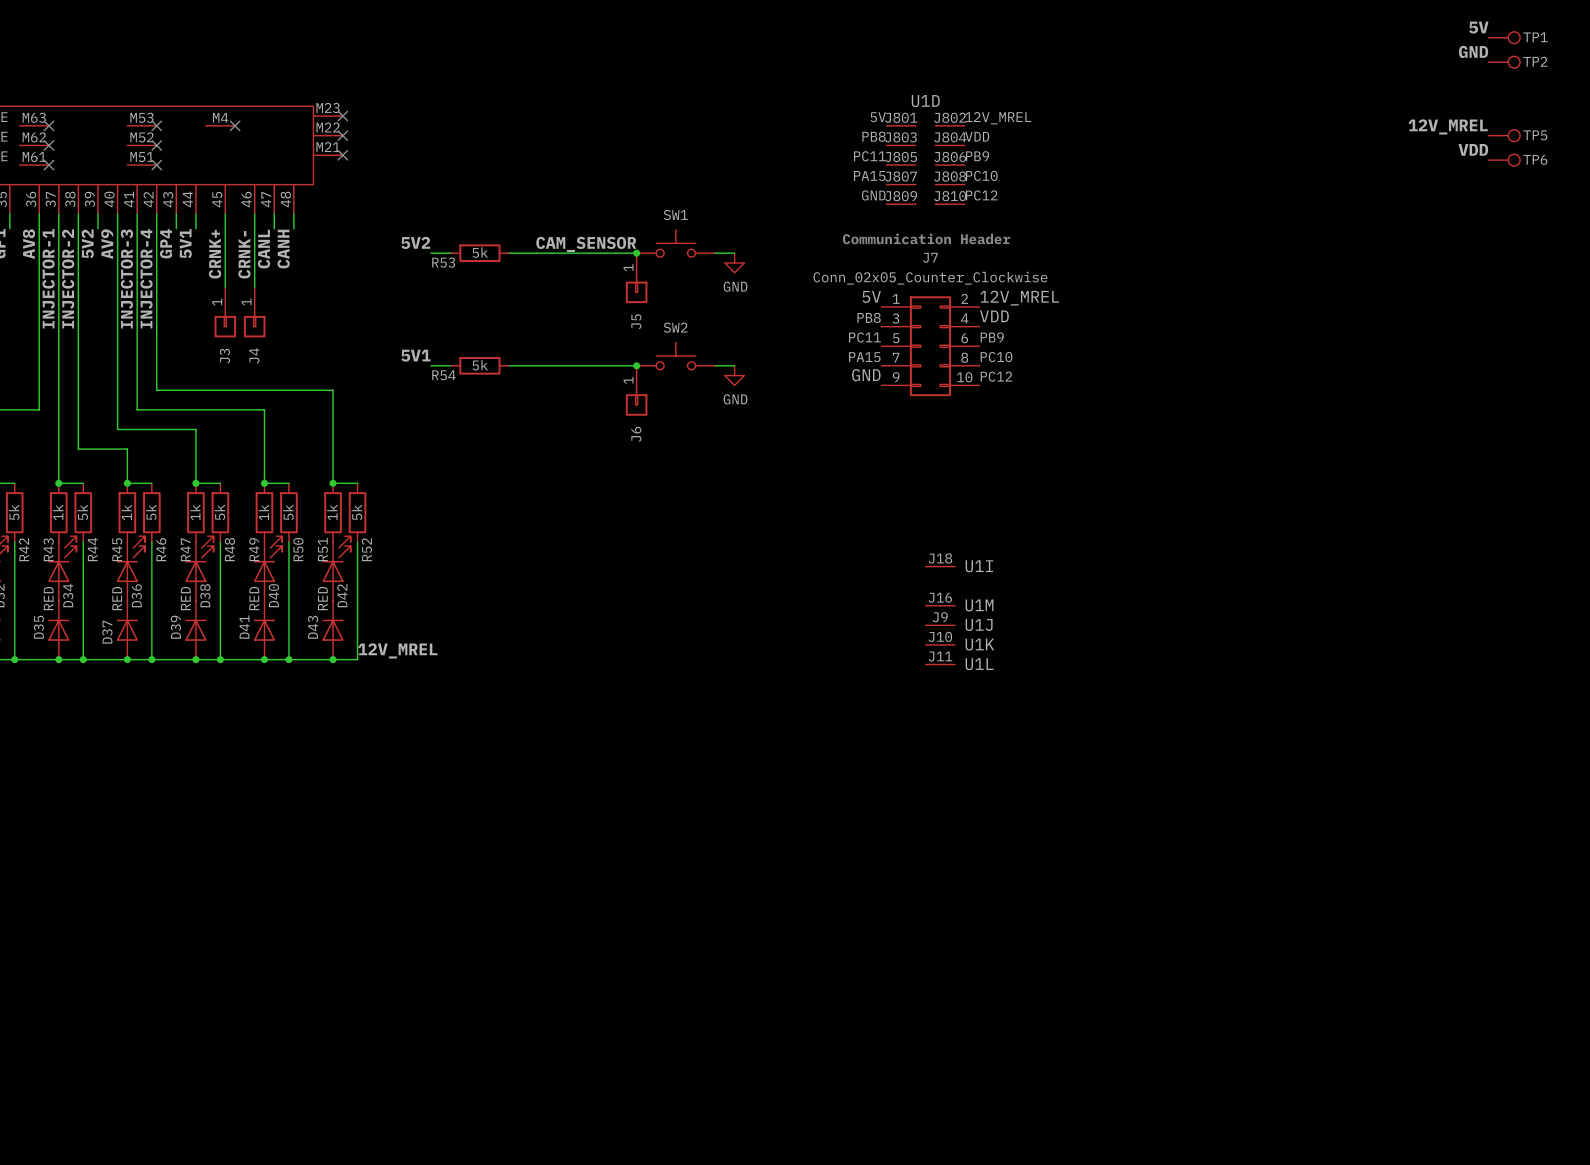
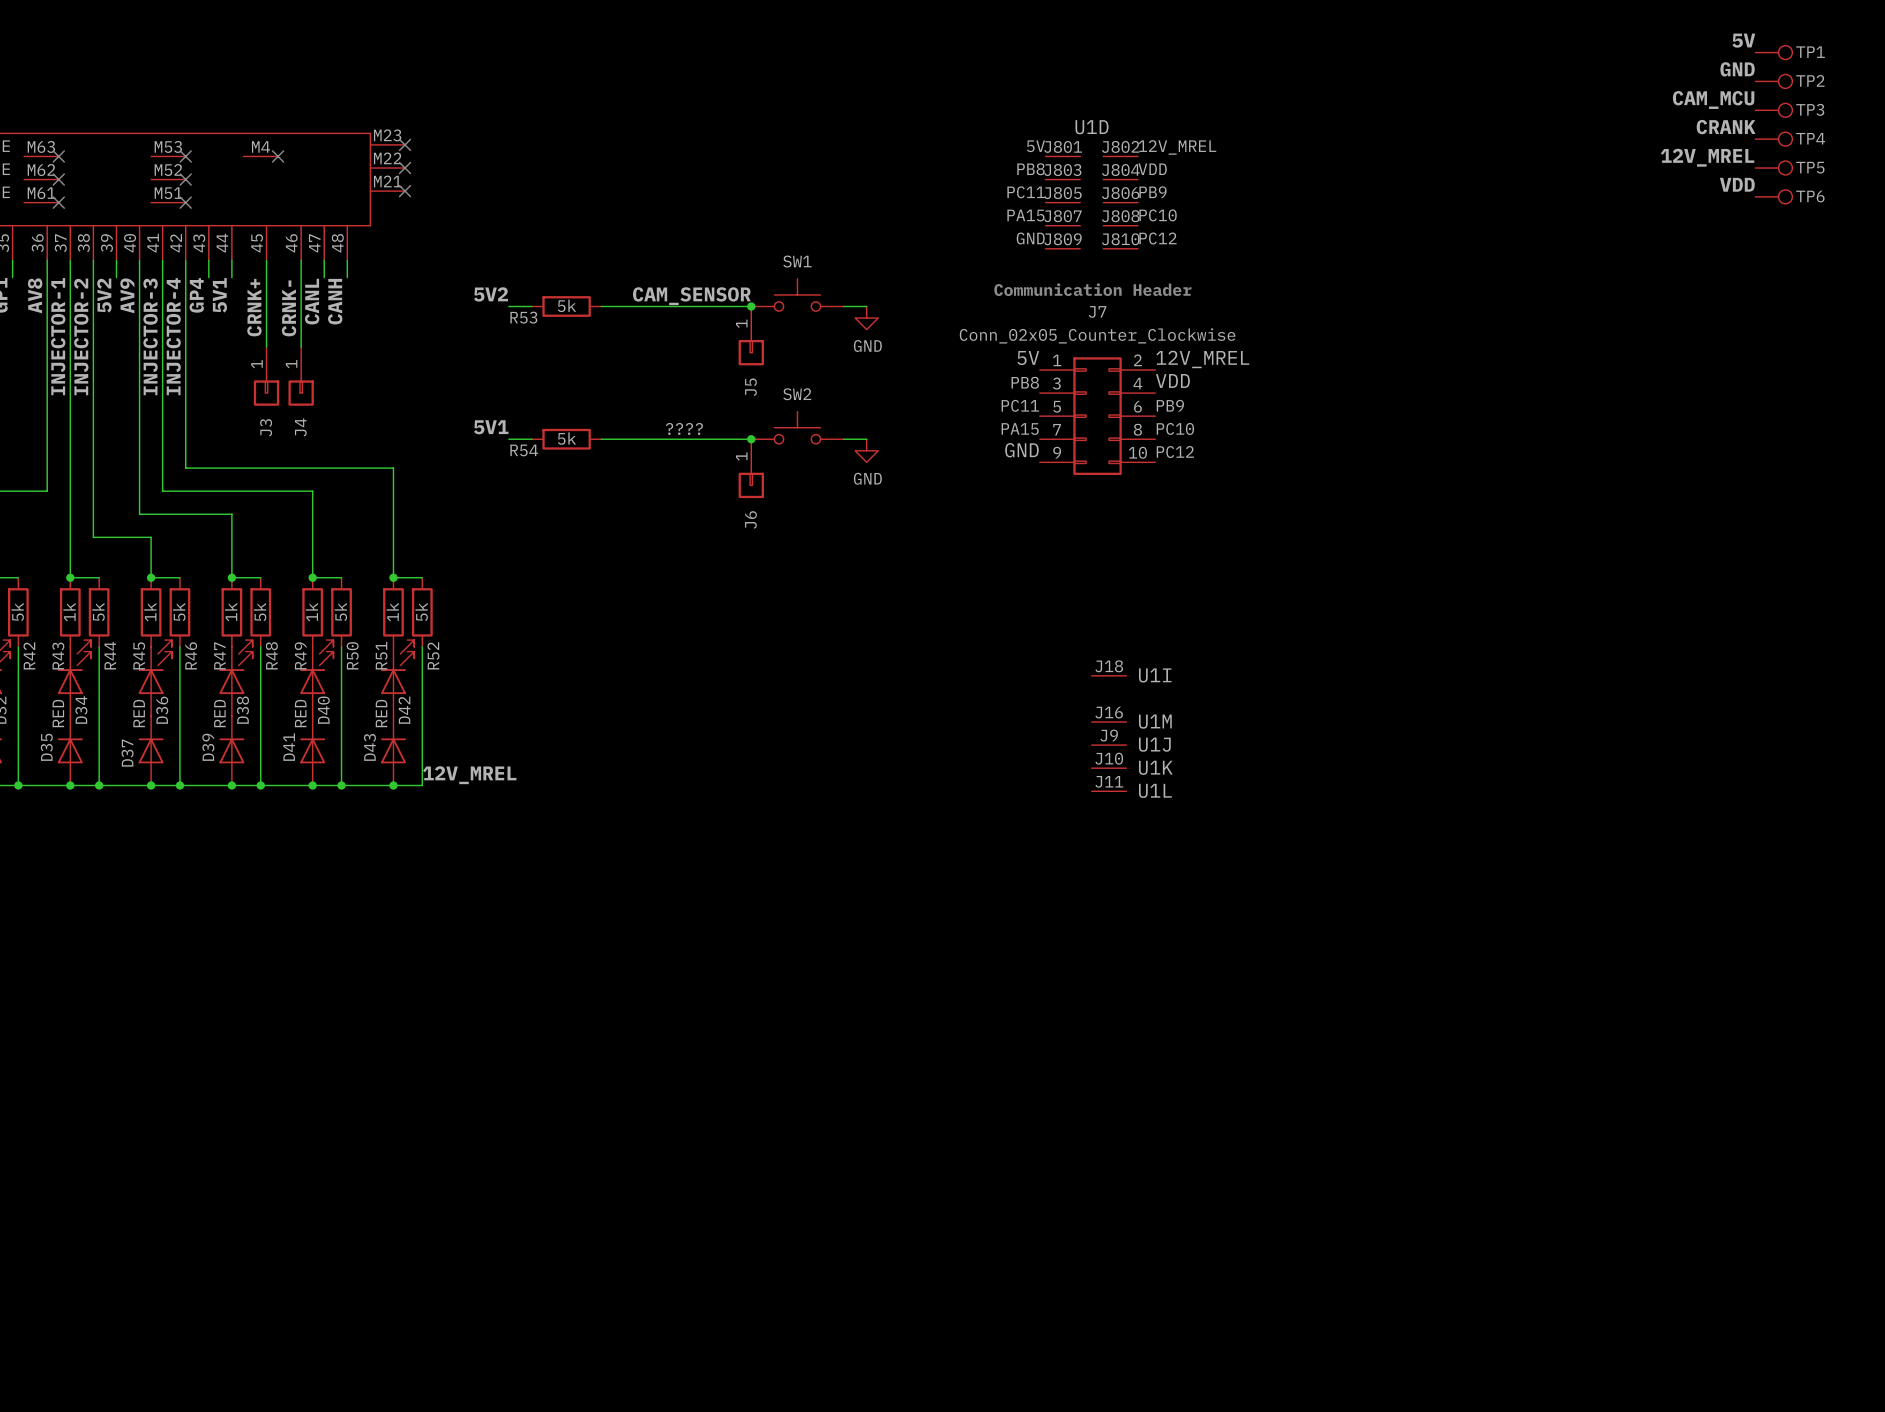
label: none -> CAM_MCU (1713, 100)
TP3: none -> (1773, 110)
label: none -> CRANK (1726, 127)
TP4: none -> (1773, 139)
label: none -> ???? (684, 428)

